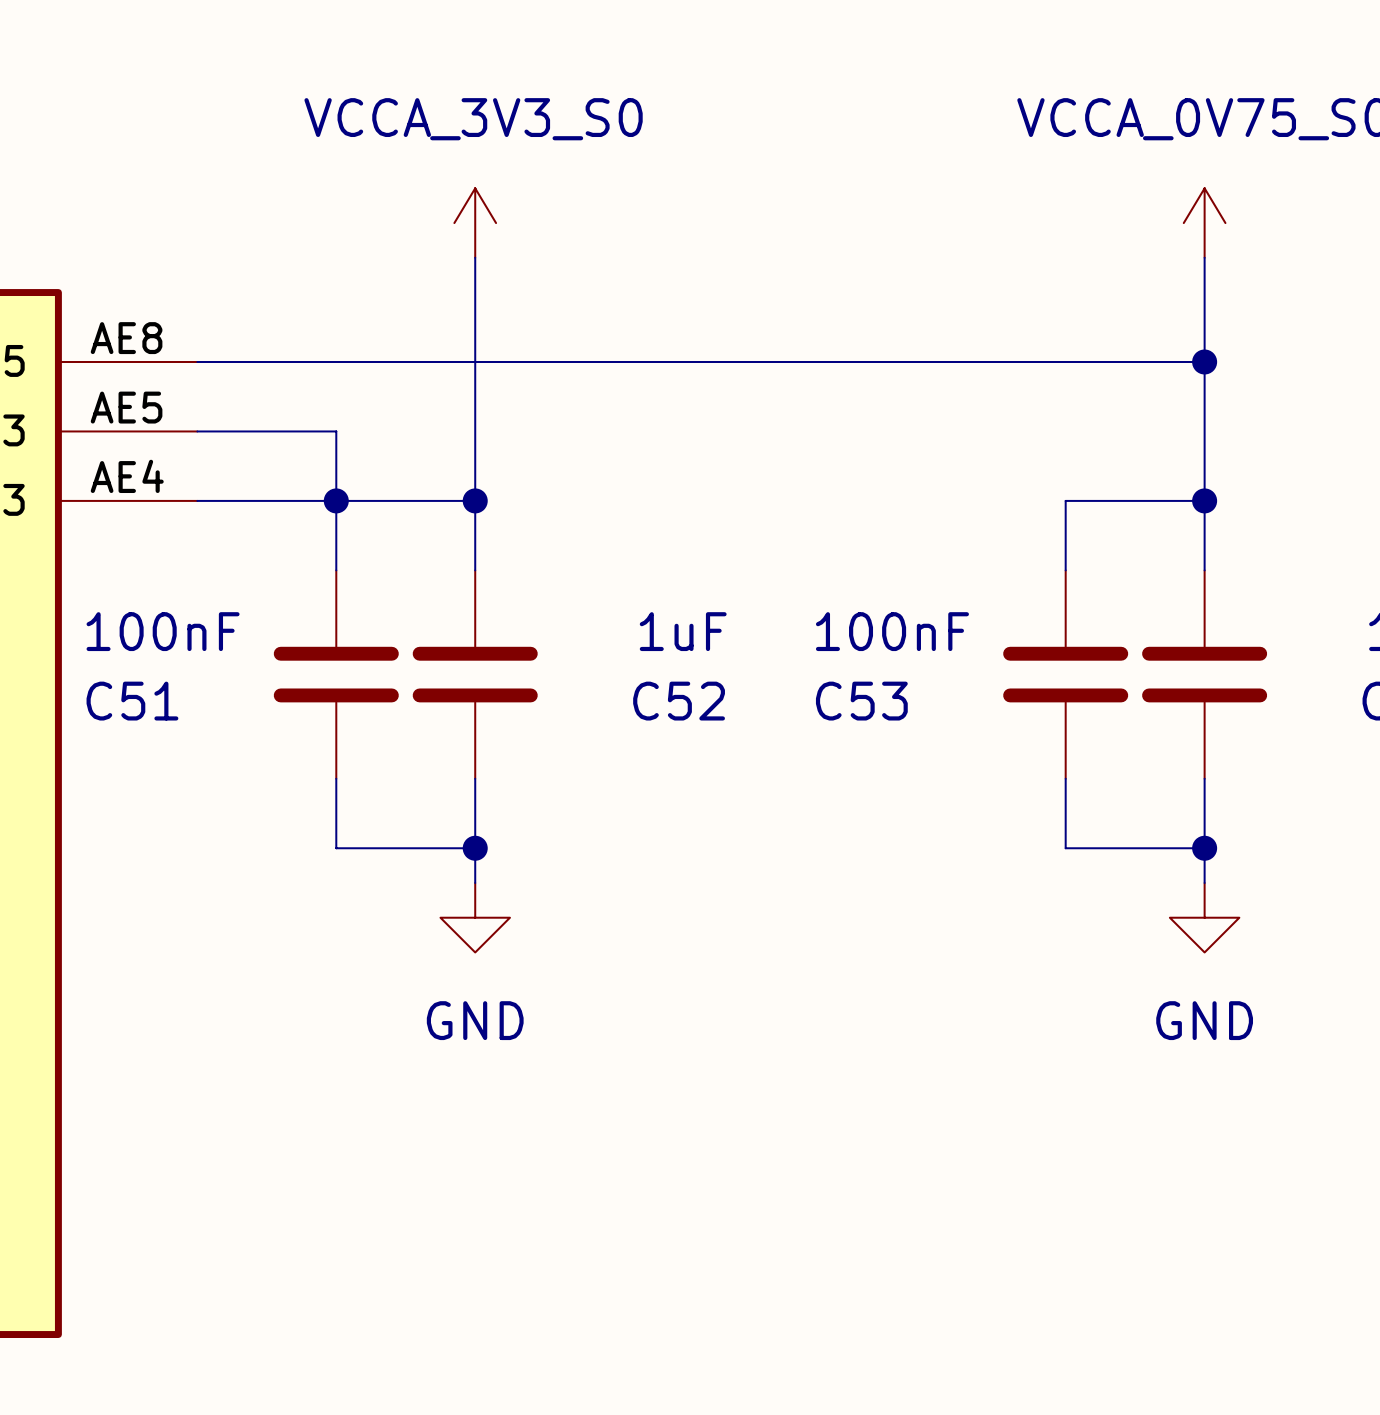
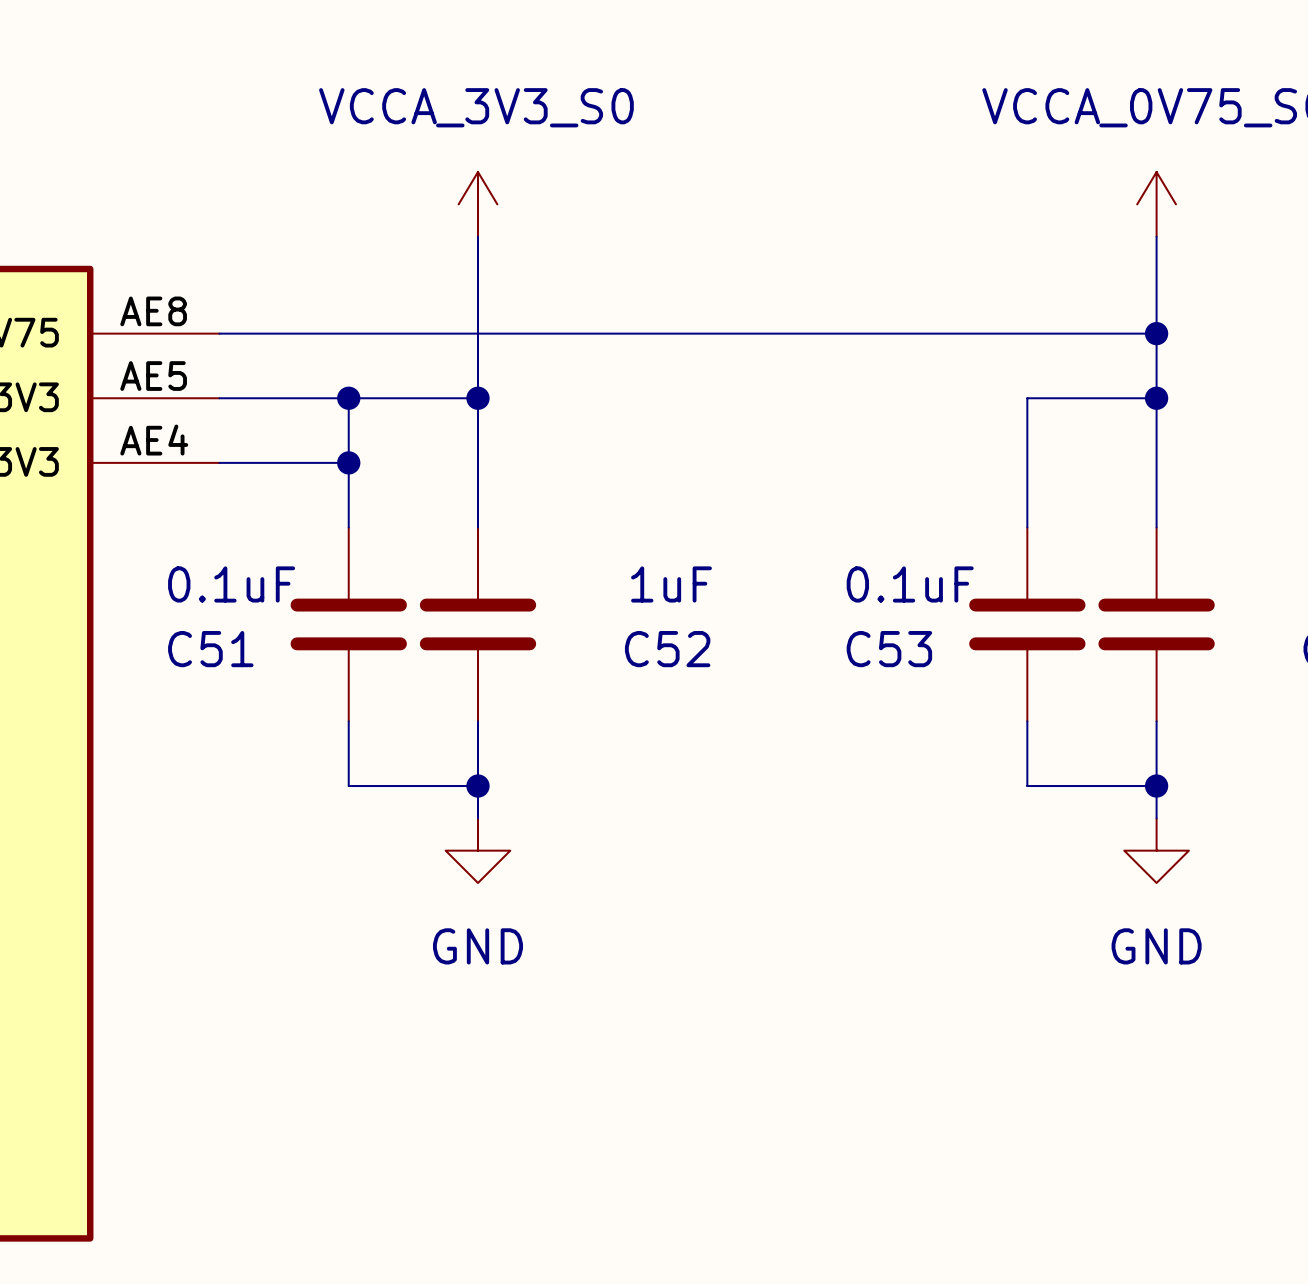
junction: none -> (348, 398)
wire: (336, 500) (475, 500) -> (348, 398) (478, 398)
junction position: (475, 500) -> (478, 398)
wire: (1065, 500) (1204, 500) -> (1027, 462) (1027, 398) (1156, 398)
junction position: (1204, 500) -> (1156, 398)
C51 value: 100nF (163, 631) -> 0.1uF (231, 584)
C53 value: 100nF (892, 631) -> 0.1uF (910, 584)
C51 name position: C51 (132, 701) -> C51 (210, 649)
C53 name position: C53 (861, 701) -> C53 (889, 649)

